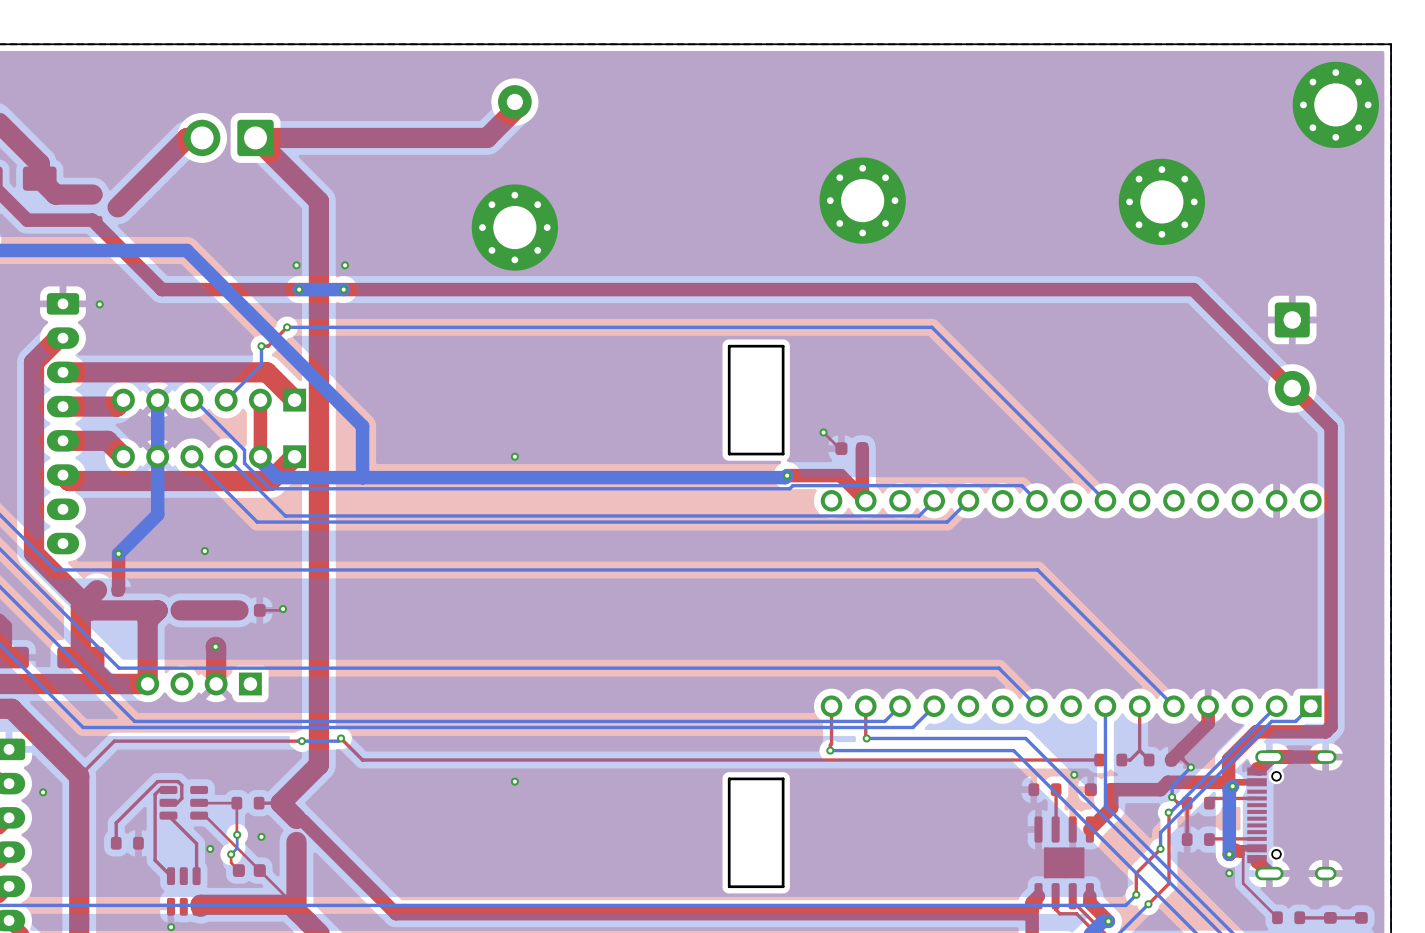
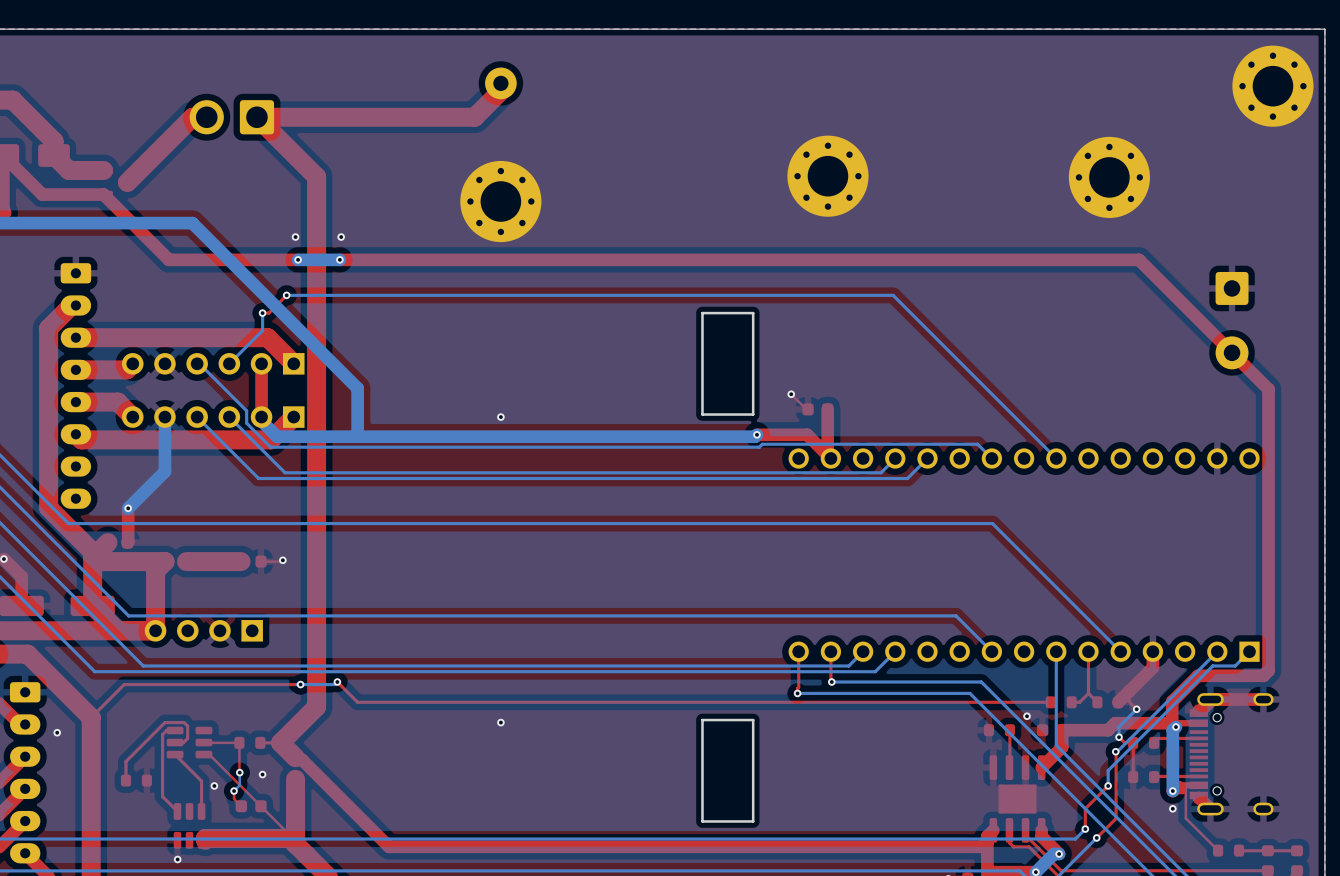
via: (99, 304) -> none
bottom track: (157, 400) (157, 456) -> none
via: (204, 551) -> none
top track: (215, 646) (216, 684) -> none
via: (215, 646) -> none

